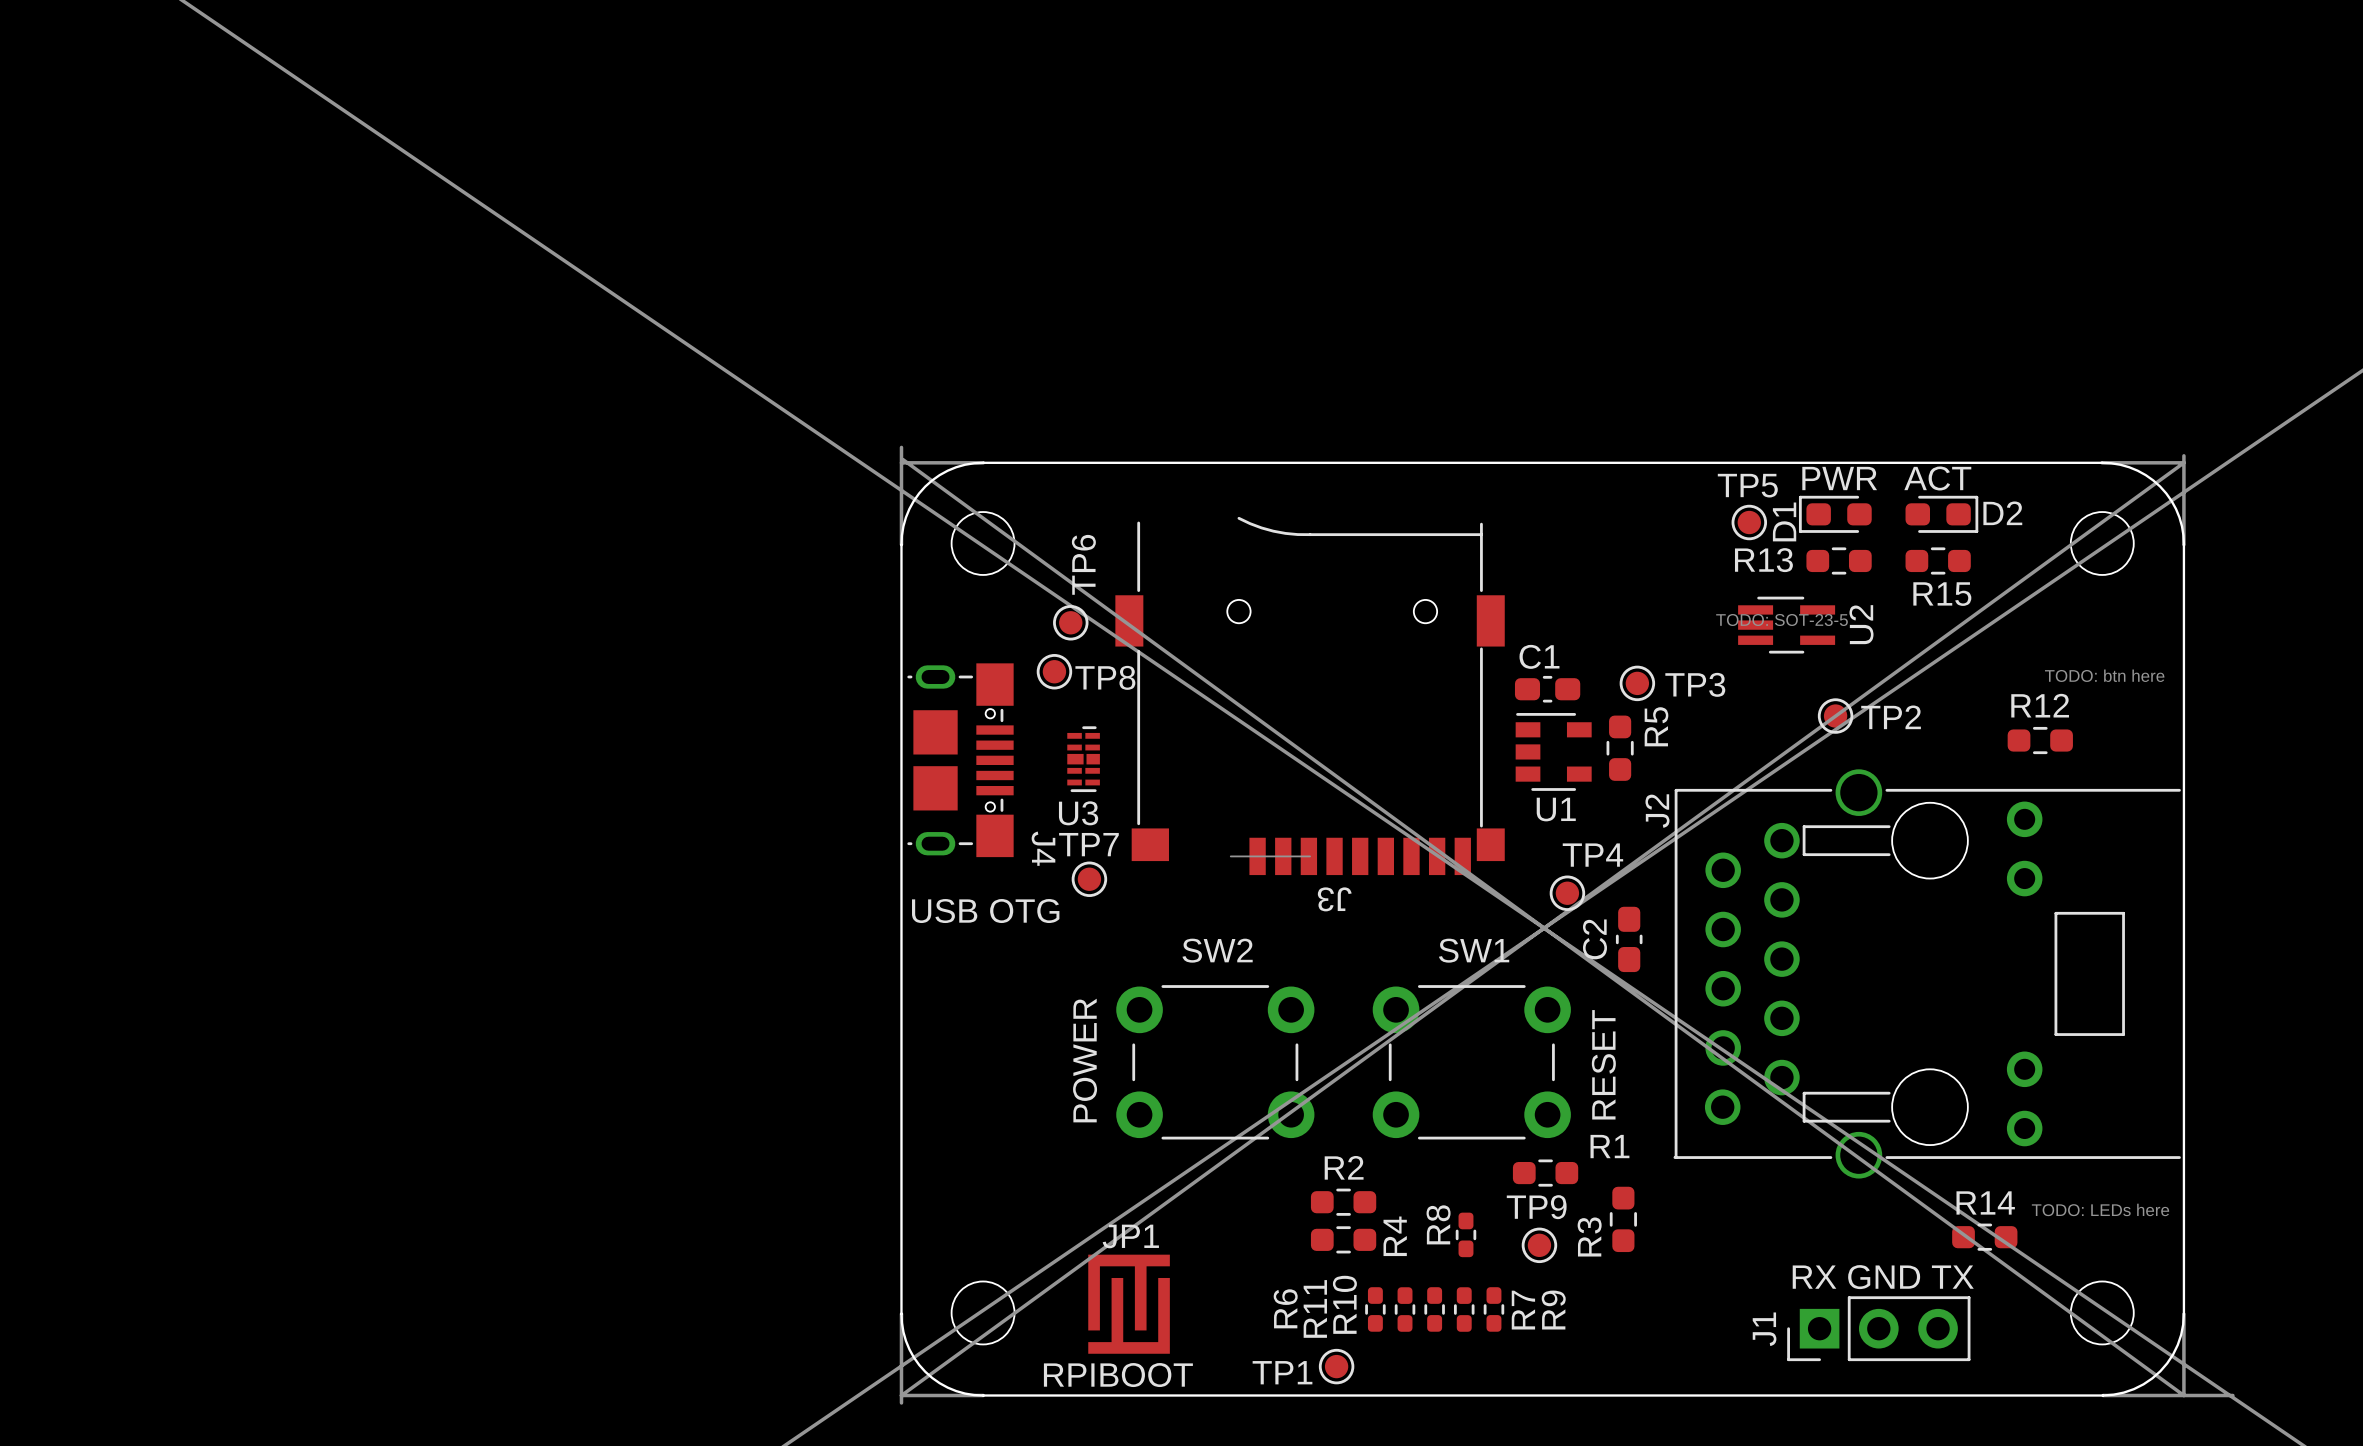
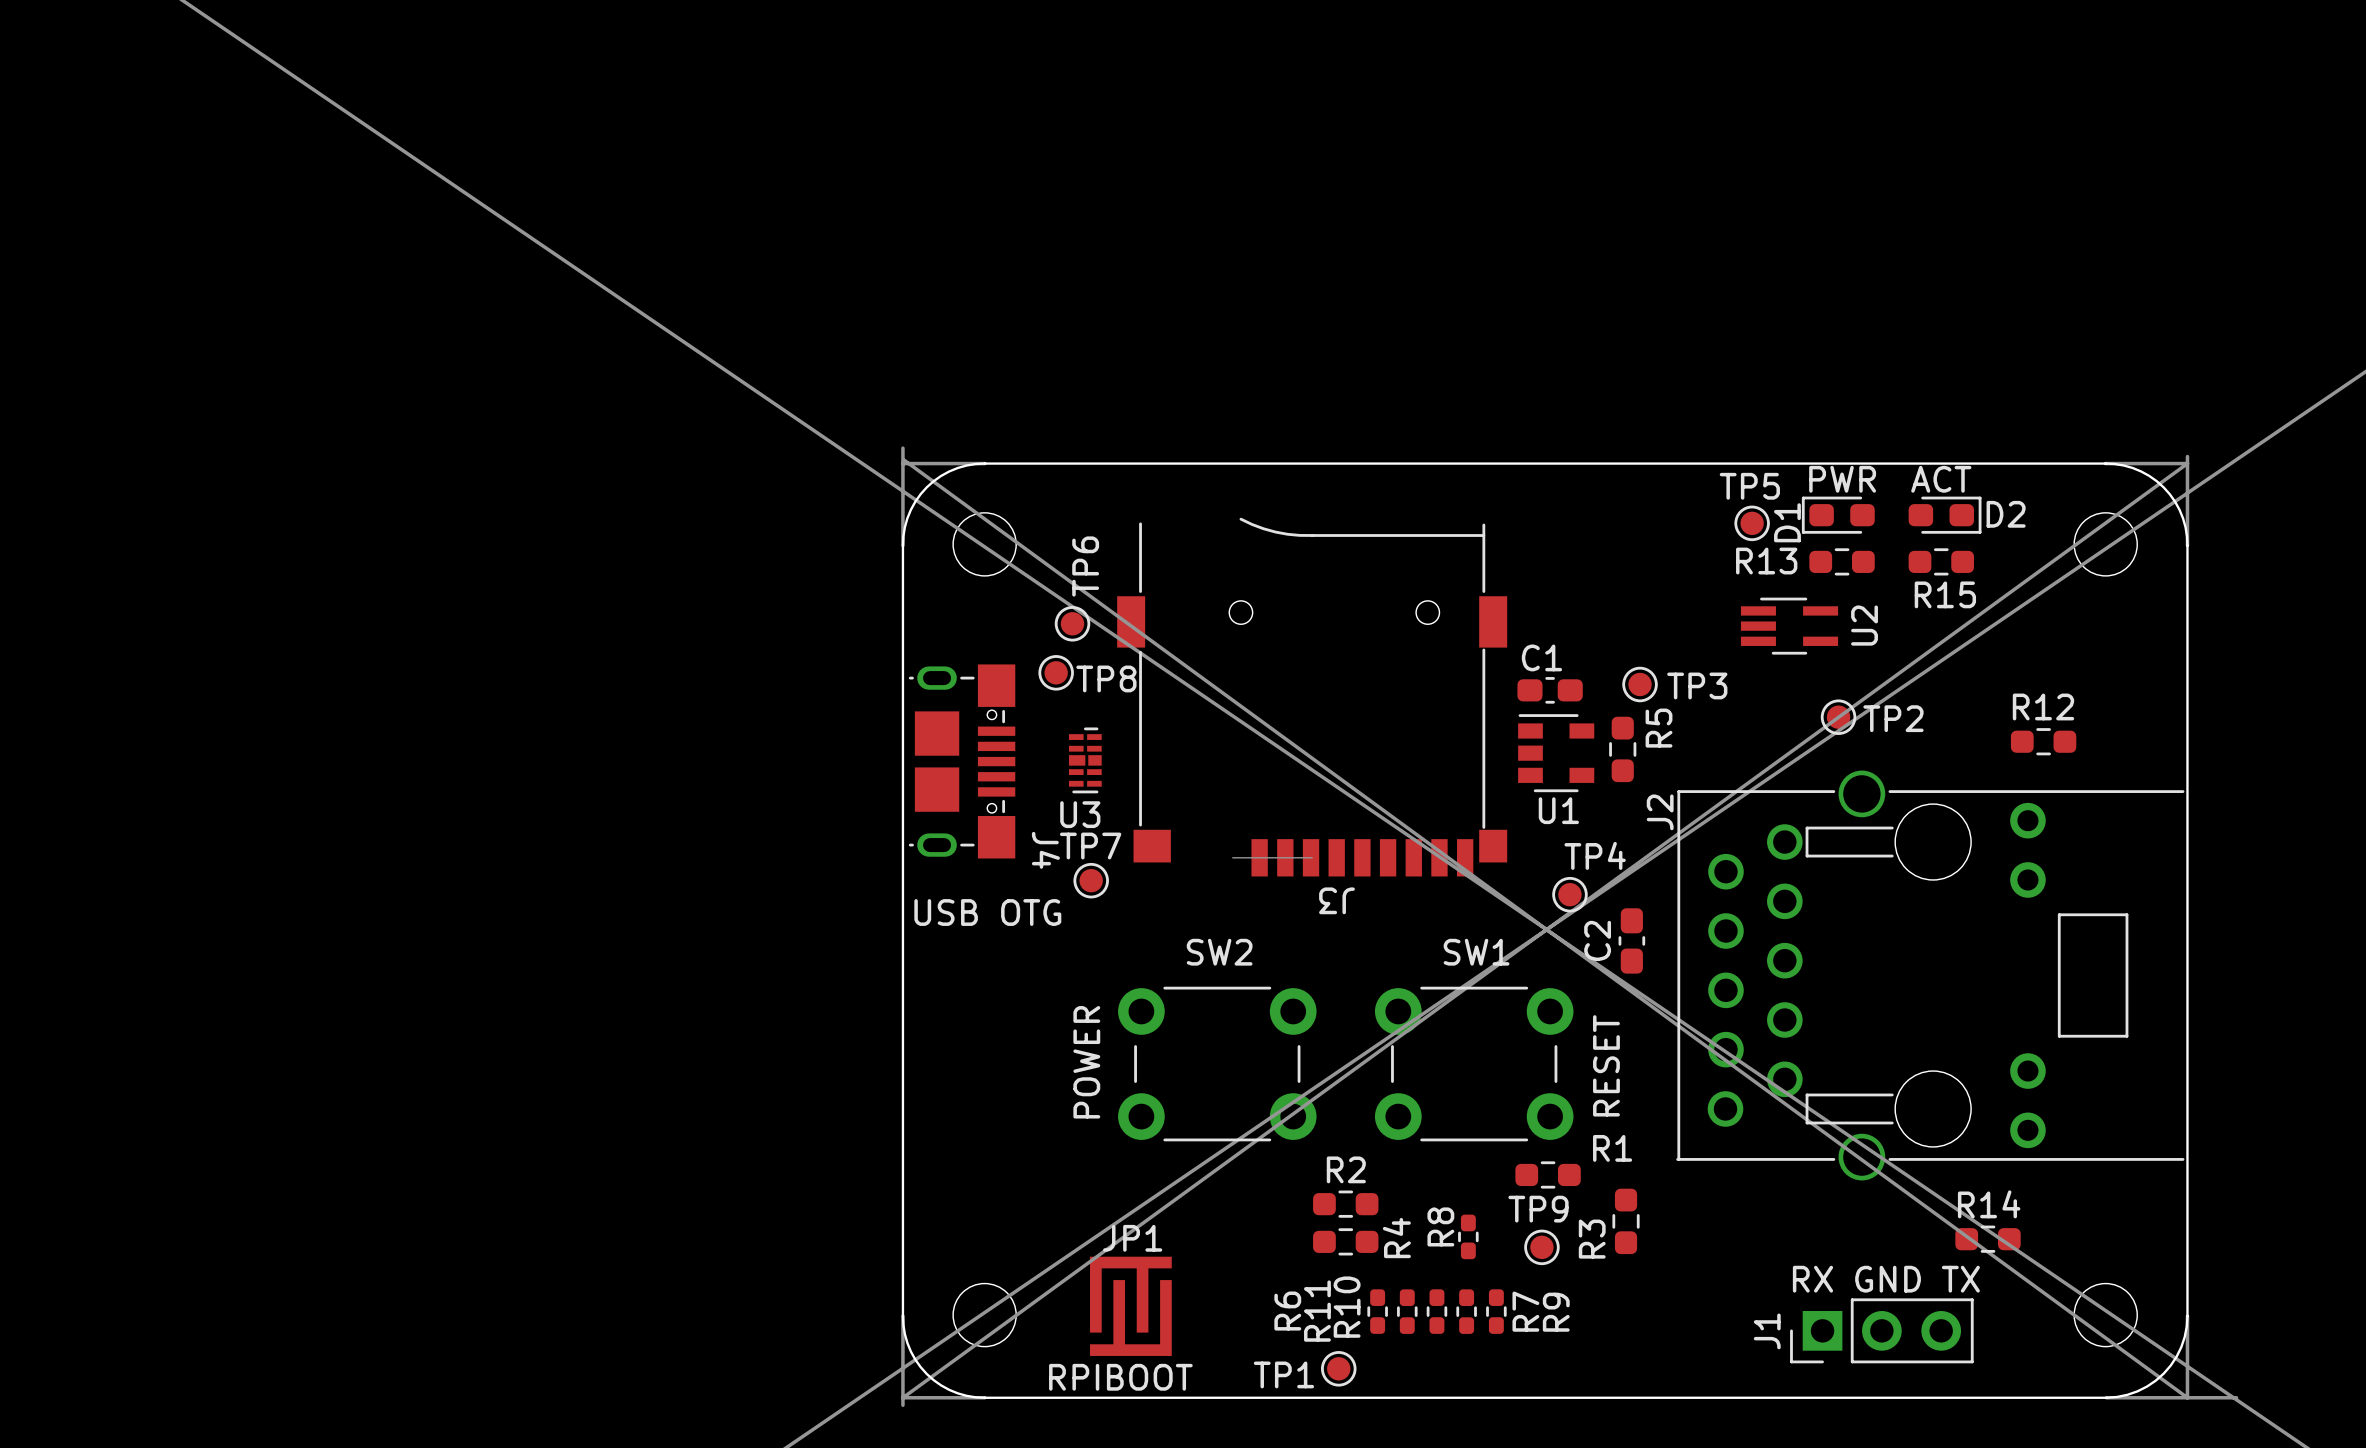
text: TODO: SOT-23-5 (1782, 620) -> none
text: TODO: btn here (2104, 675) -> none
text: TODO: LEDs here (2100, 1209) -> none

